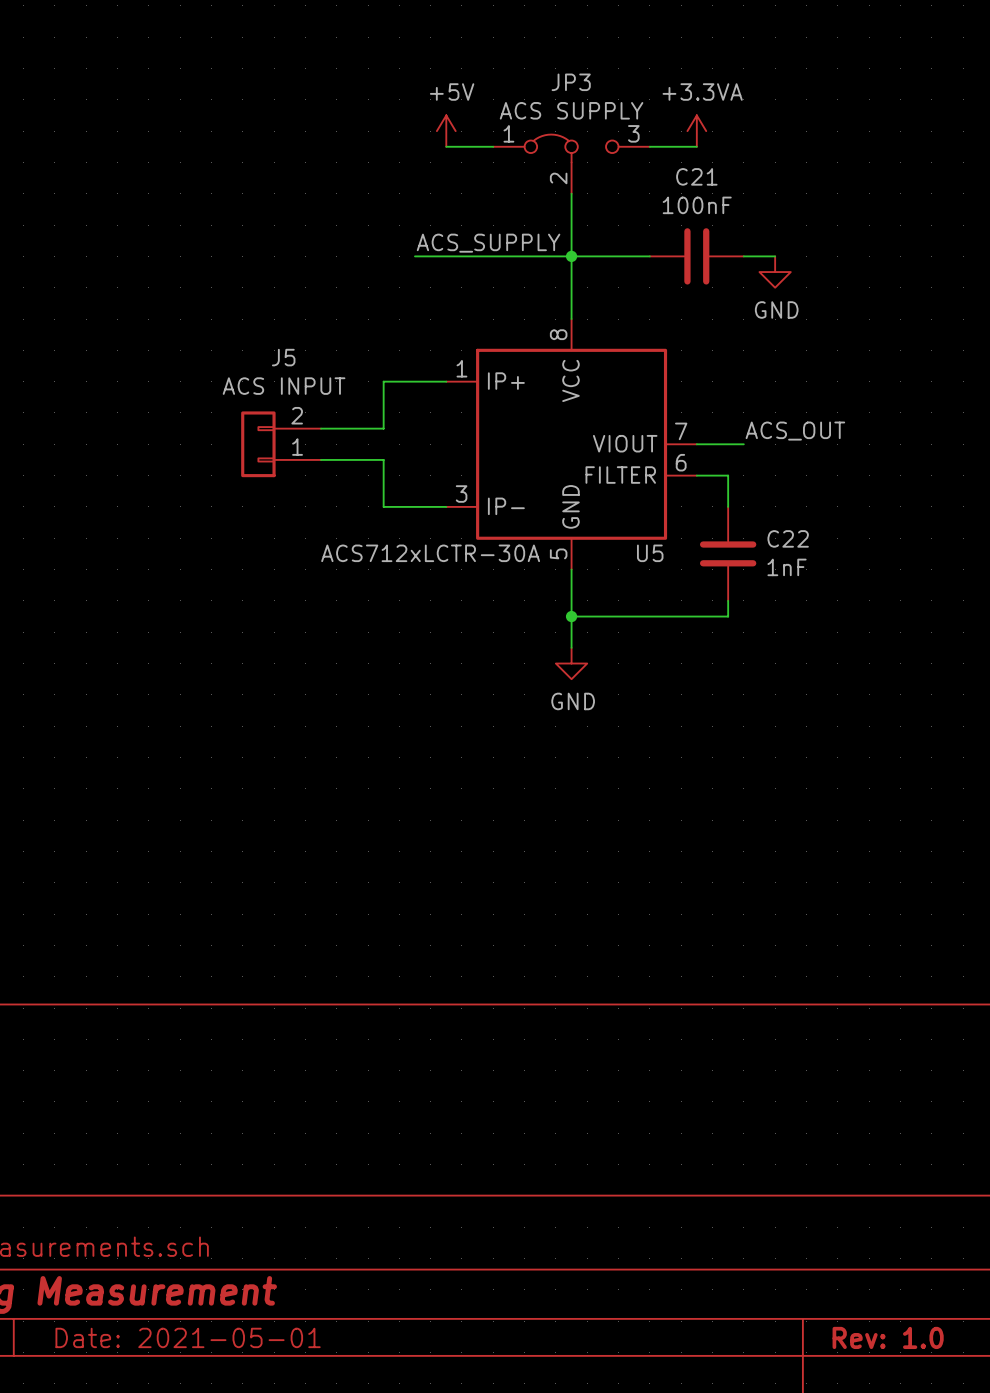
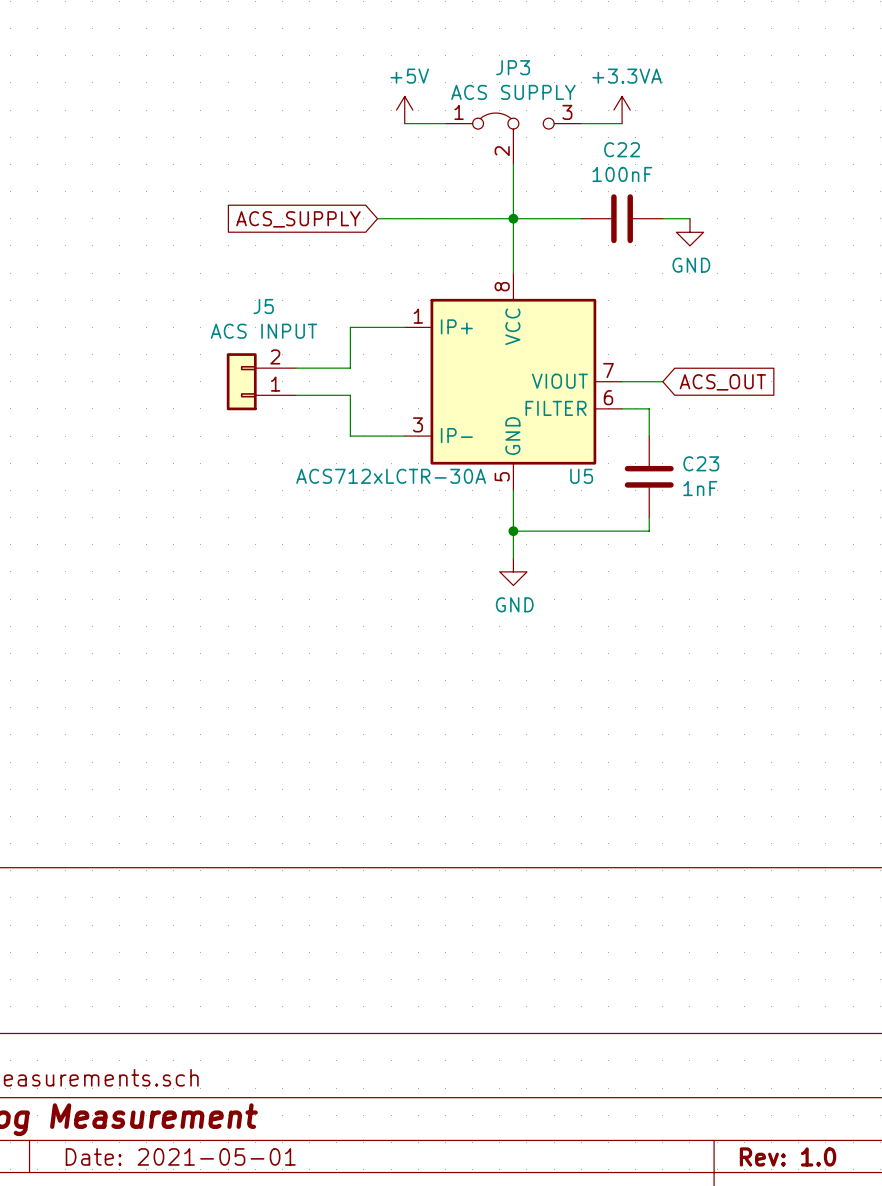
C21 name: C21 (696, 176) -> C22 (622, 149)
label: ACS_SUPPLY (488, 243) -> none
global label: none -> ACS_SUPPLY (298, 219)
label: ACS_OUT (795, 431) -> none
global label: none -> ACS_OUT (722, 382)
C22 name: C22 (788, 538) -> C23 (701, 463)

